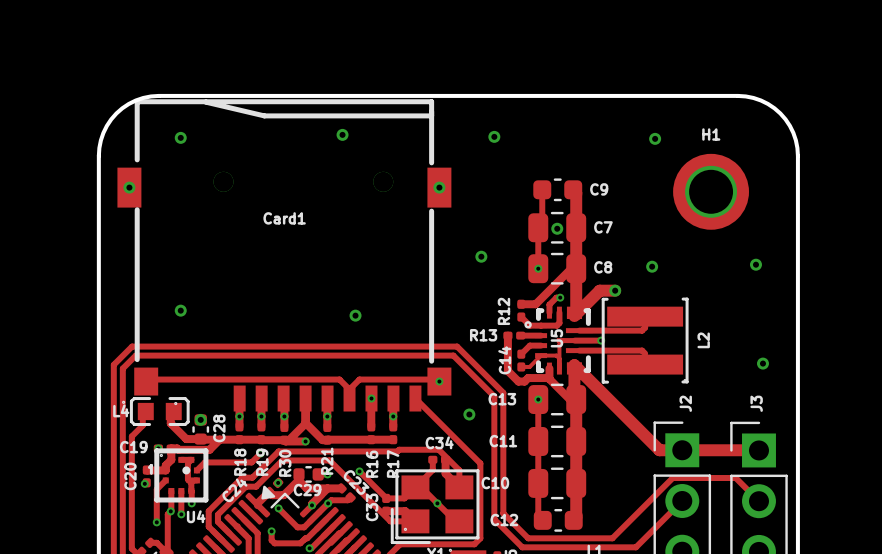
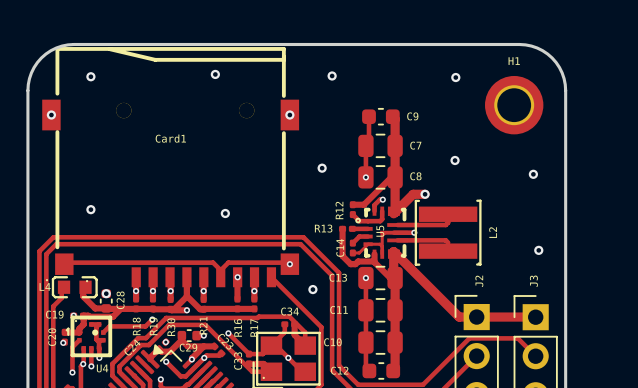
H1 position: (711, 191) -> (514, 105)
via: (557, 228) -> none
via position: (652, 266) -> (455, 160)

